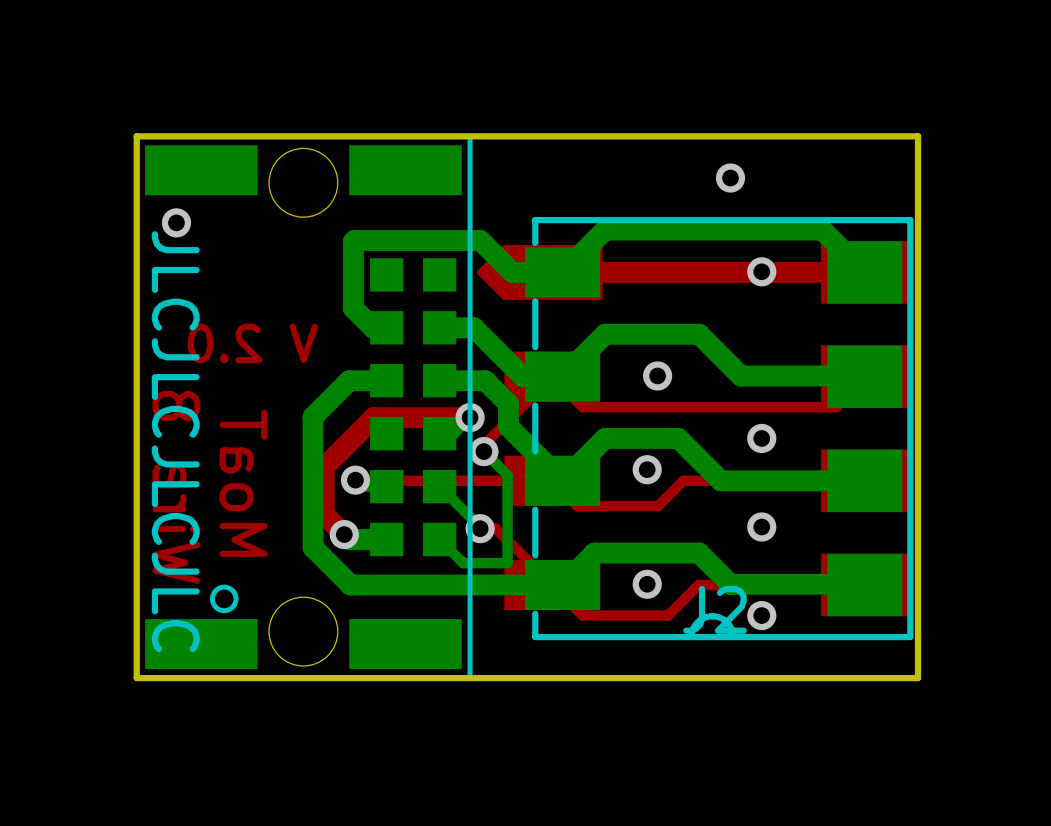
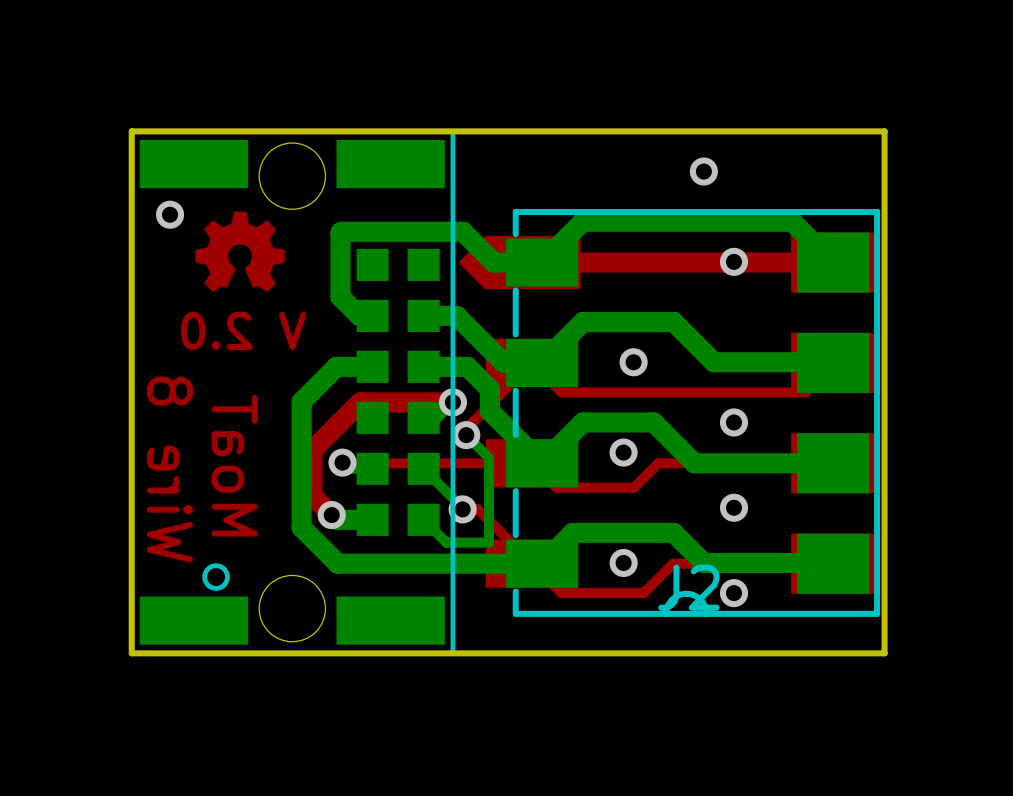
drawing: none -> [195, 211, 285, 293]
text: JLCJLCJLCJLC (175, 441) -> none

